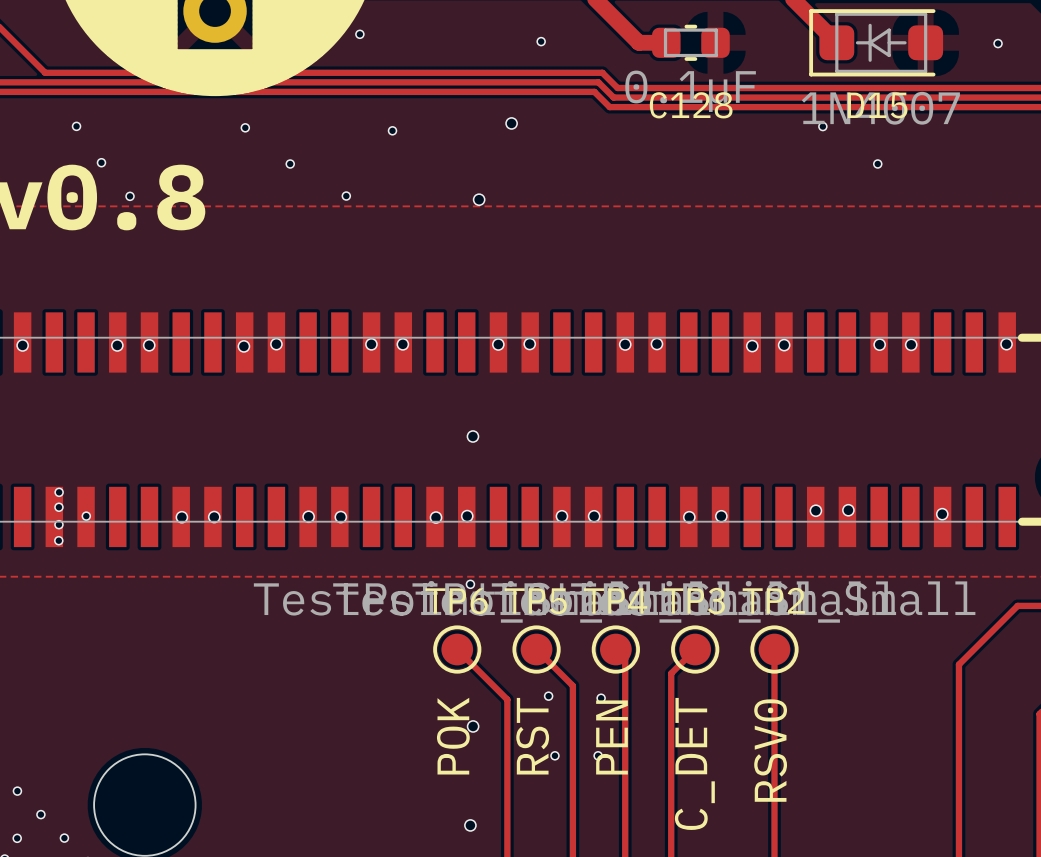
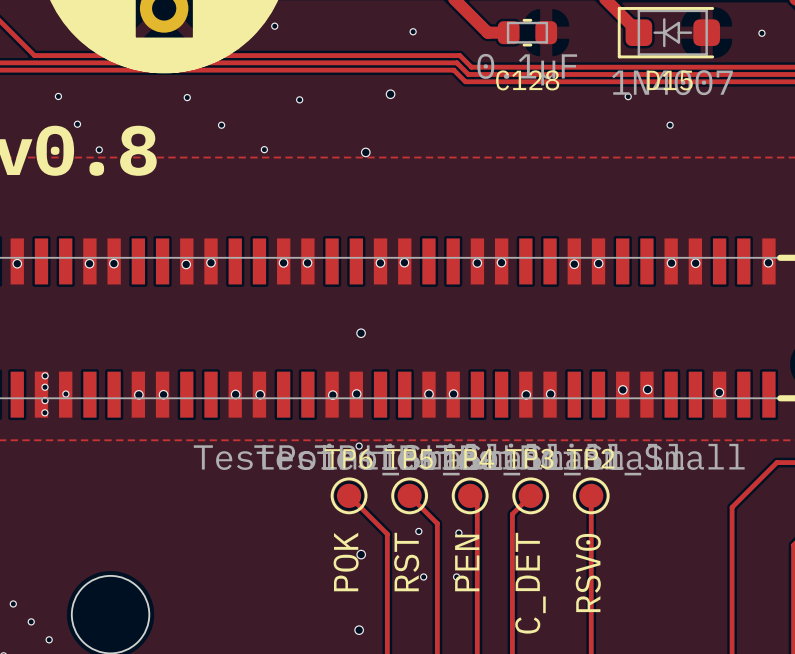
via: (17, 838) -> none

